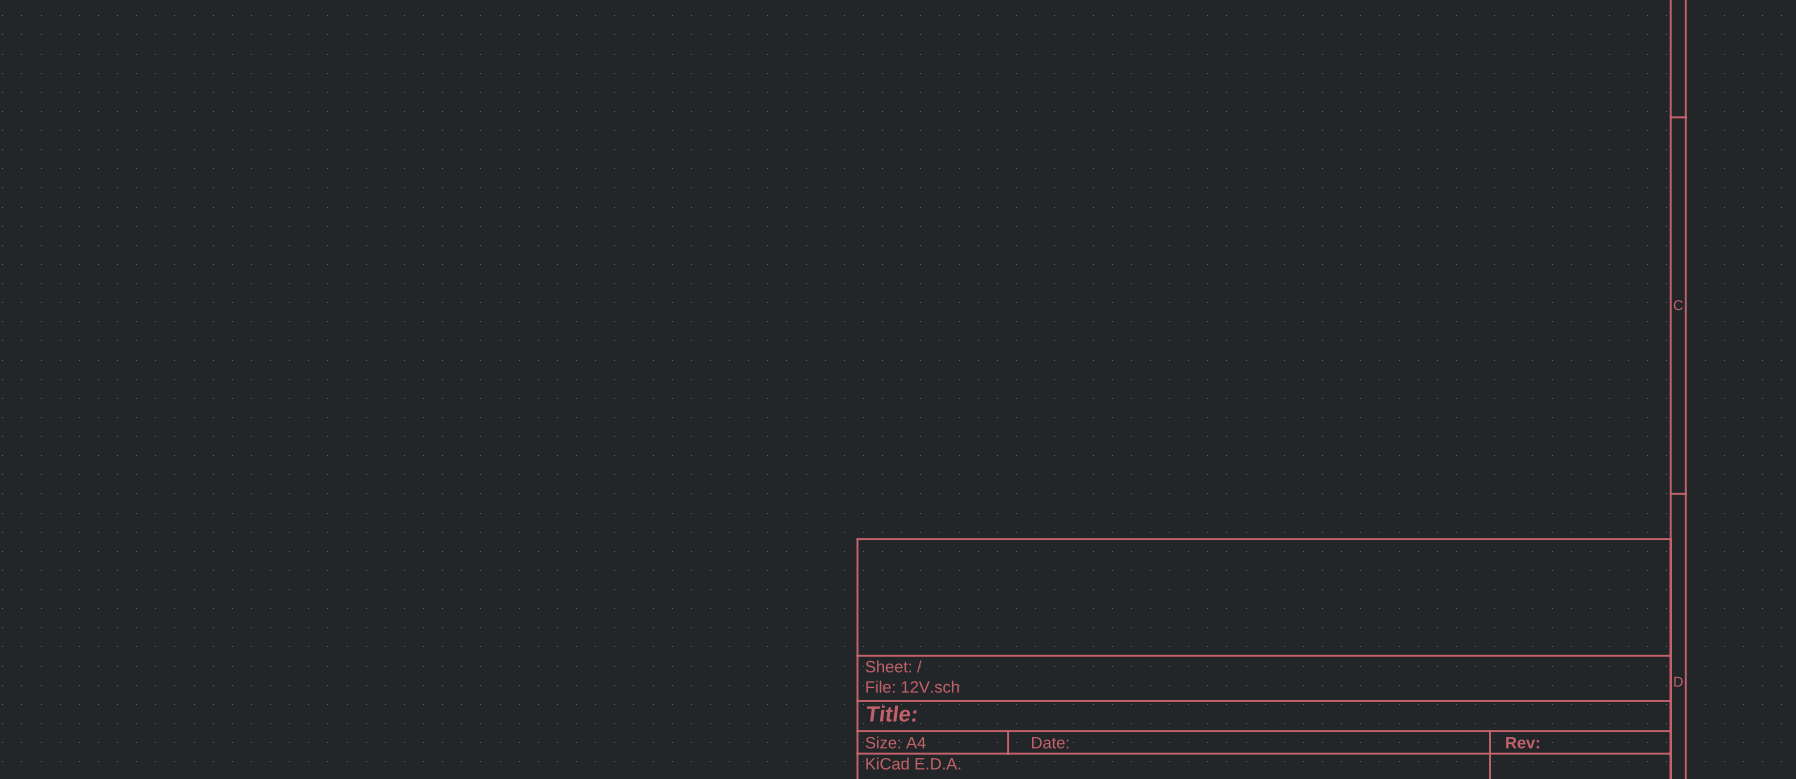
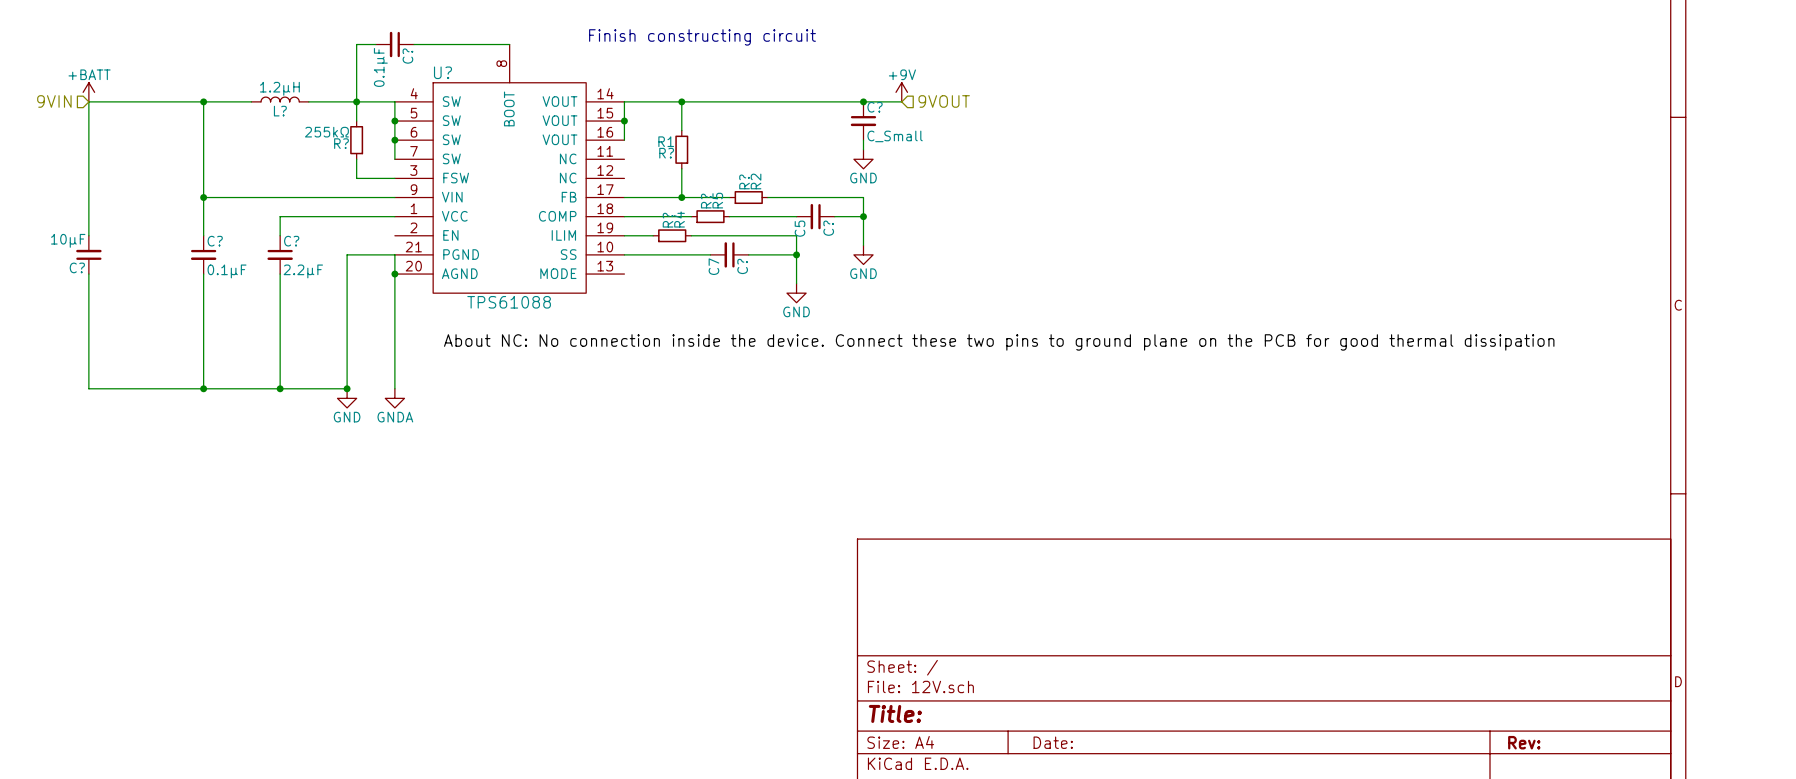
text: none -> Finish constructing circuit (702, 37)
wire: none -> (375, 44) (356, 44) (356, 121)
C?: none -> 0.1µF (394, 44)
wire: none -> (414, 44) (509, 44)
power symbol: none -> +BATT (88, 92)
power symbol: none -> +9V (901, 92)
L?: none -> 1.2µH (280, 99)
hierarchical label: none -> 9VIN (54, 101)
wire: none -> (203, 101) (203, 235)
junction: none -> (203, 101)
wire: none -> (251, 101) (88, 101) (88, 235)
wire: none -> (308, 101) (394, 101) (394, 159)
junction: none -> (356, 101)
wire: none -> (681, 101) (681, 130)
junction: none -> (681, 101)
junction: none -> (863, 101)
wire: none -> (901, 101) (624, 101) (624, 140)
hierarchical label: none -> 9VOUT (944, 101)
junction: none -> (394, 121)
junction: none -> (624, 121)
C?: none -> C_Small (863, 121)
R?: none -> 255kΩ (356, 140)
junction: none -> (394, 140)
wire: none -> (863, 140) (863, 149)
R?: none -> R1 (681, 149)
wire: none -> (356, 159) (356, 178) (394, 178)
power symbol: none -> GND (863, 159)
U?: none -> TPS61088 (509, 168)
wire: none -> (681, 168) (681, 197)
wire: none -> (203, 197) (394, 197)
junction: none -> (203, 197)
wire: none -> (624, 197) (729, 197)
junction: none -> (681, 197)
R?: none -> R2 (748, 197)
wire: none -> (767, 197) (863, 197) (863, 245)
wire: none -> (394, 216) (280, 216) (280, 235)
wire: none -> (624, 216) (691, 216)
R?: none -> R5 (710, 216)
wire: none -> (729, 216) (796, 216)
C?: none -> C5 (815, 216)
wire: none -> (834, 216) (863, 216)
junction: none -> (863, 216)
wire: none -> (624, 235) (653, 235)
R?: none -> R4 (672, 235)
wire: none -> (691, 235) (796, 235) (796, 283)
C?: none -> 10µF (88, 254)
C?: none -> 0.1µF (203, 254)
C?: none -> 2.2µF (280, 254)
wire: none -> (624, 254) (710, 254)
C?: none -> C7 (729, 254)
wire: none -> (748, 254) (796, 254)
junction: none -> (796, 254)
power symbol: none -> GND (863, 254)
wire: none -> (88, 274) (88, 388) (347, 388) (347, 254) (394, 254) (394, 388)
wire: none -> (203, 274) (203, 388)
wire: none -> (280, 274) (280, 388)
junction: none -> (394, 274)
power symbol: none -> GND (796, 293)
label: none -> About NC: No connection inside the device. Connect these two pins to ground plane on the PCB for good thermal dissipation (999, 342)
junction: none -> (203, 388)
junction: none -> (280, 388)
junction: none -> (347, 388)
power symbol: none -> GND (347, 398)
power symbol: none -> GNDA (394, 398)

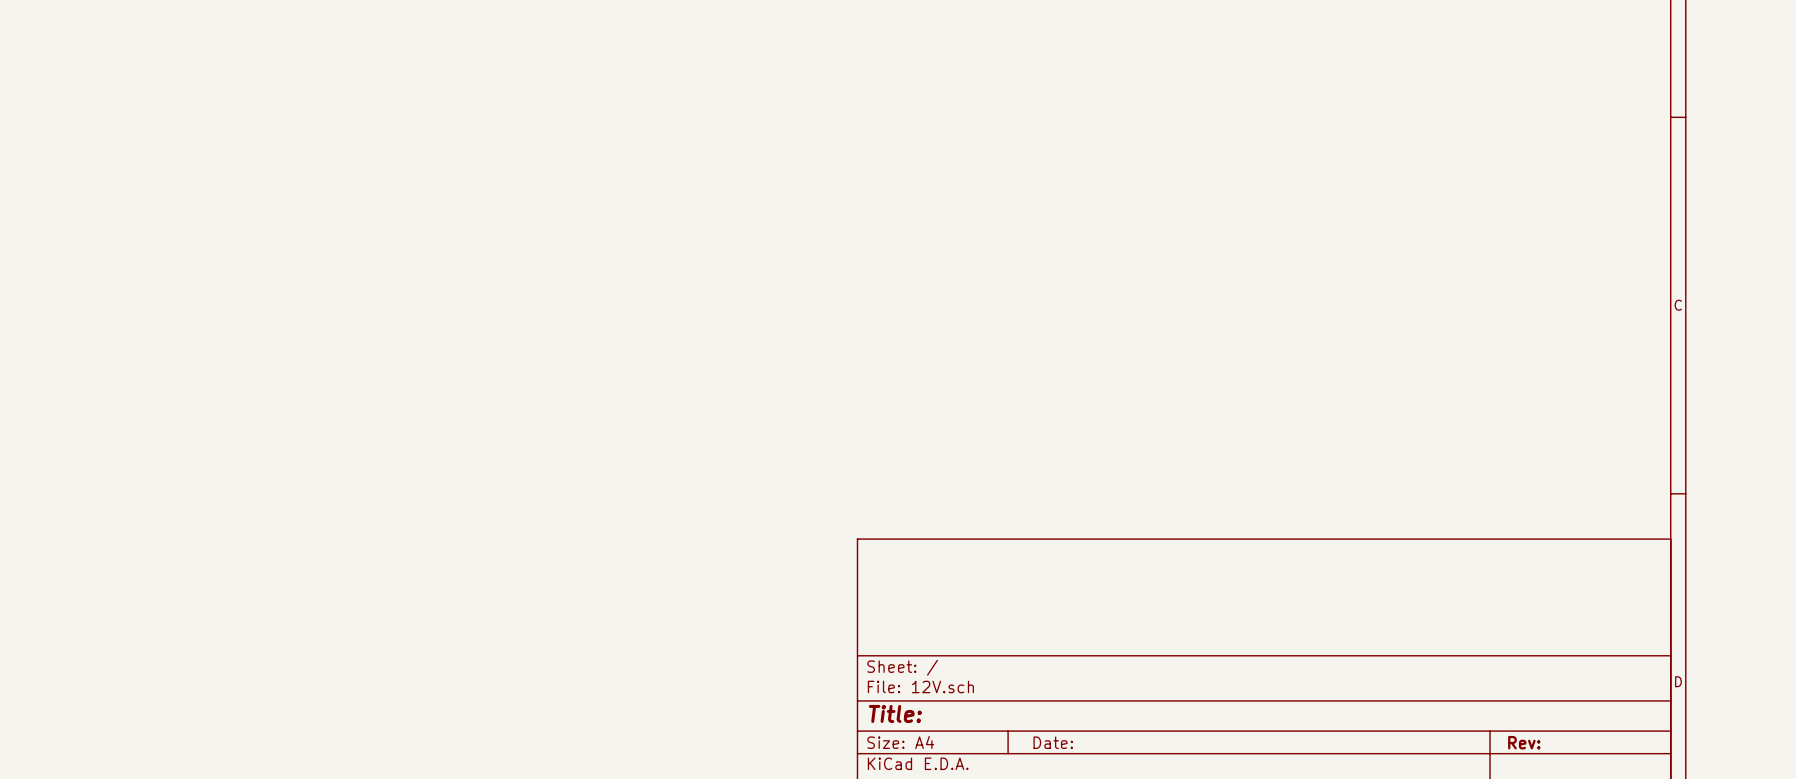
text: Finish constructing circuit (702, 37) -> none
wire: (375, 44) (356, 44) (356, 121) -> none
C?: 0.1µF (394, 44) -> none
wire: (414, 44) (509, 44) -> none
power symbol: +BATT (88, 92) -> none
power symbol: +9V (901, 92) -> none
L?: 1.2µH (280, 99) -> none
hierarchical label: 9VIN (54, 101) -> none
wire: (203, 101) (203, 235) -> none
junction: (203, 101) -> none
wire: (251, 101) (88, 101) (88, 235) -> none
wire: (308, 101) (394, 101) (394, 159) -> none
junction: (356, 101) -> none
wire: (681, 101) (681, 130) -> none
junction: (681, 101) -> none
junction: (863, 101) -> none
wire: (901, 101) (624, 101) (624, 140) -> none
hierarchical label: 9VOUT (944, 101) -> none
junction: (394, 121) -> none
junction: (624, 121) -> none
C?: C_Small (863, 121) -> none
R?: 255kΩ (356, 140) -> none
junction: (394, 140) -> none
wire: (863, 140) (863, 149) -> none
R?: R1 (681, 149) -> none
wire: (356, 159) (356, 178) (394, 178) -> none
power symbol: GND (863, 159) -> none
U?: TPS61088 (509, 168) -> none
wire: (681, 168) (681, 197) -> none
wire: (203, 197) (394, 197) -> none
junction: (203, 197) -> none
wire: (624, 197) (729, 197) -> none
junction: (681, 197) -> none
R?: R2 (748, 197) -> none
wire: (767, 197) (863, 197) (863, 245) -> none
wire: (394, 216) (280, 216) (280, 235) -> none
wire: (624, 216) (691, 216) -> none
R?: R5 (710, 216) -> none
wire: (729, 216) (796, 216) -> none
C?: C5 (815, 216) -> none
wire: (834, 216) (863, 216) -> none
junction: (863, 216) -> none
wire: (624, 235) (653, 235) -> none
R?: R4 (672, 235) -> none
wire: (691, 235) (796, 235) (796, 283) -> none
C?: 10µF (88, 254) -> none
C?: 0.1µF (203, 254) -> none
C?: 2.2µF (280, 254) -> none
wire: (624, 254) (710, 254) -> none
C?: C7 (729, 254) -> none
wire: (748, 254) (796, 254) -> none
junction: (796, 254) -> none
power symbol: GND (863, 254) -> none
wire: (88, 274) (88, 388) (347, 388) (347, 254) (394, 254) (394, 388) -> none
wire: (203, 274) (203, 388) -> none
wire: (280, 274) (280, 388) -> none
junction: (394, 274) -> none
power symbol: GND (796, 293) -> none
label: About NC: No connection inside the device. Connect these two pins to ground plane on the PCB for good thermal dissipation (999, 342) -> none
junction: (203, 388) -> none
junction: (280, 388) -> none
junction: (347, 388) -> none
power symbol: GND (347, 398) -> none
power symbol: GNDA (394, 398) -> none

